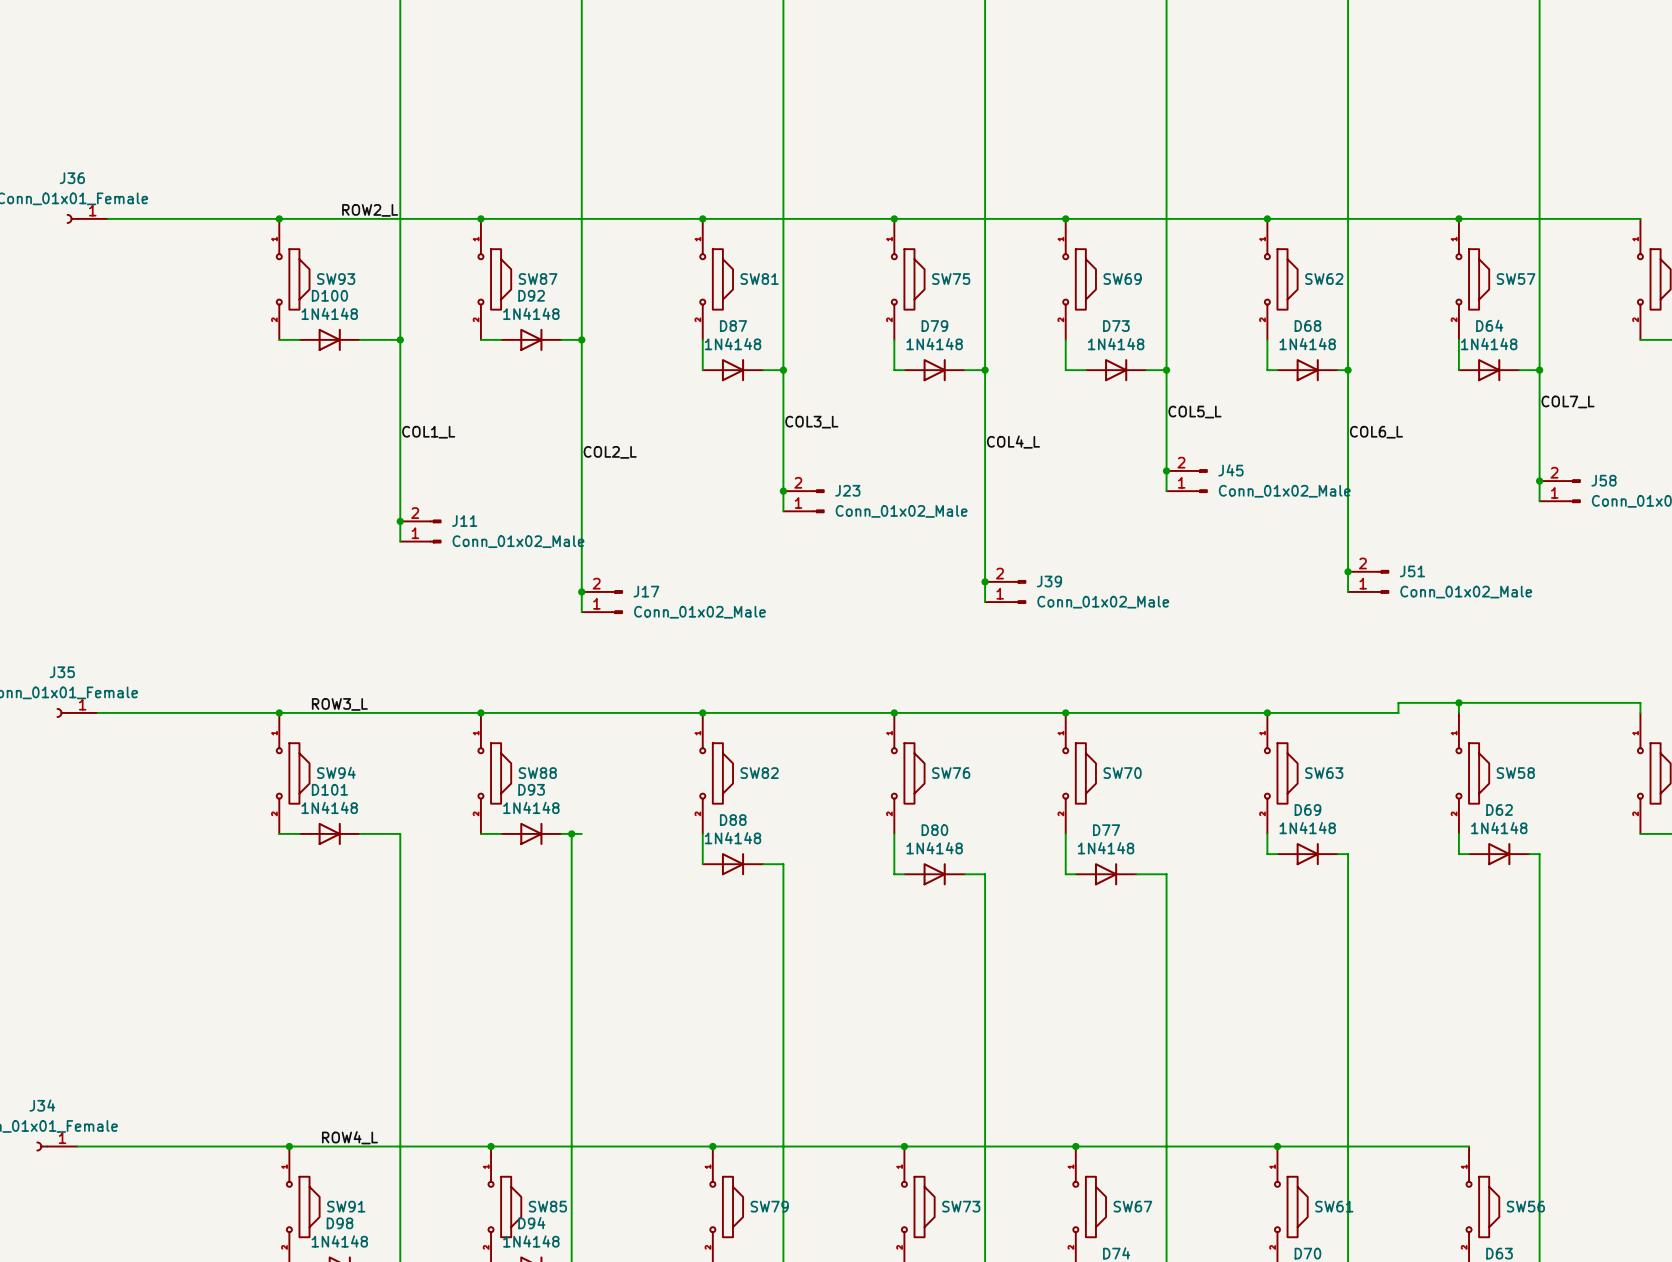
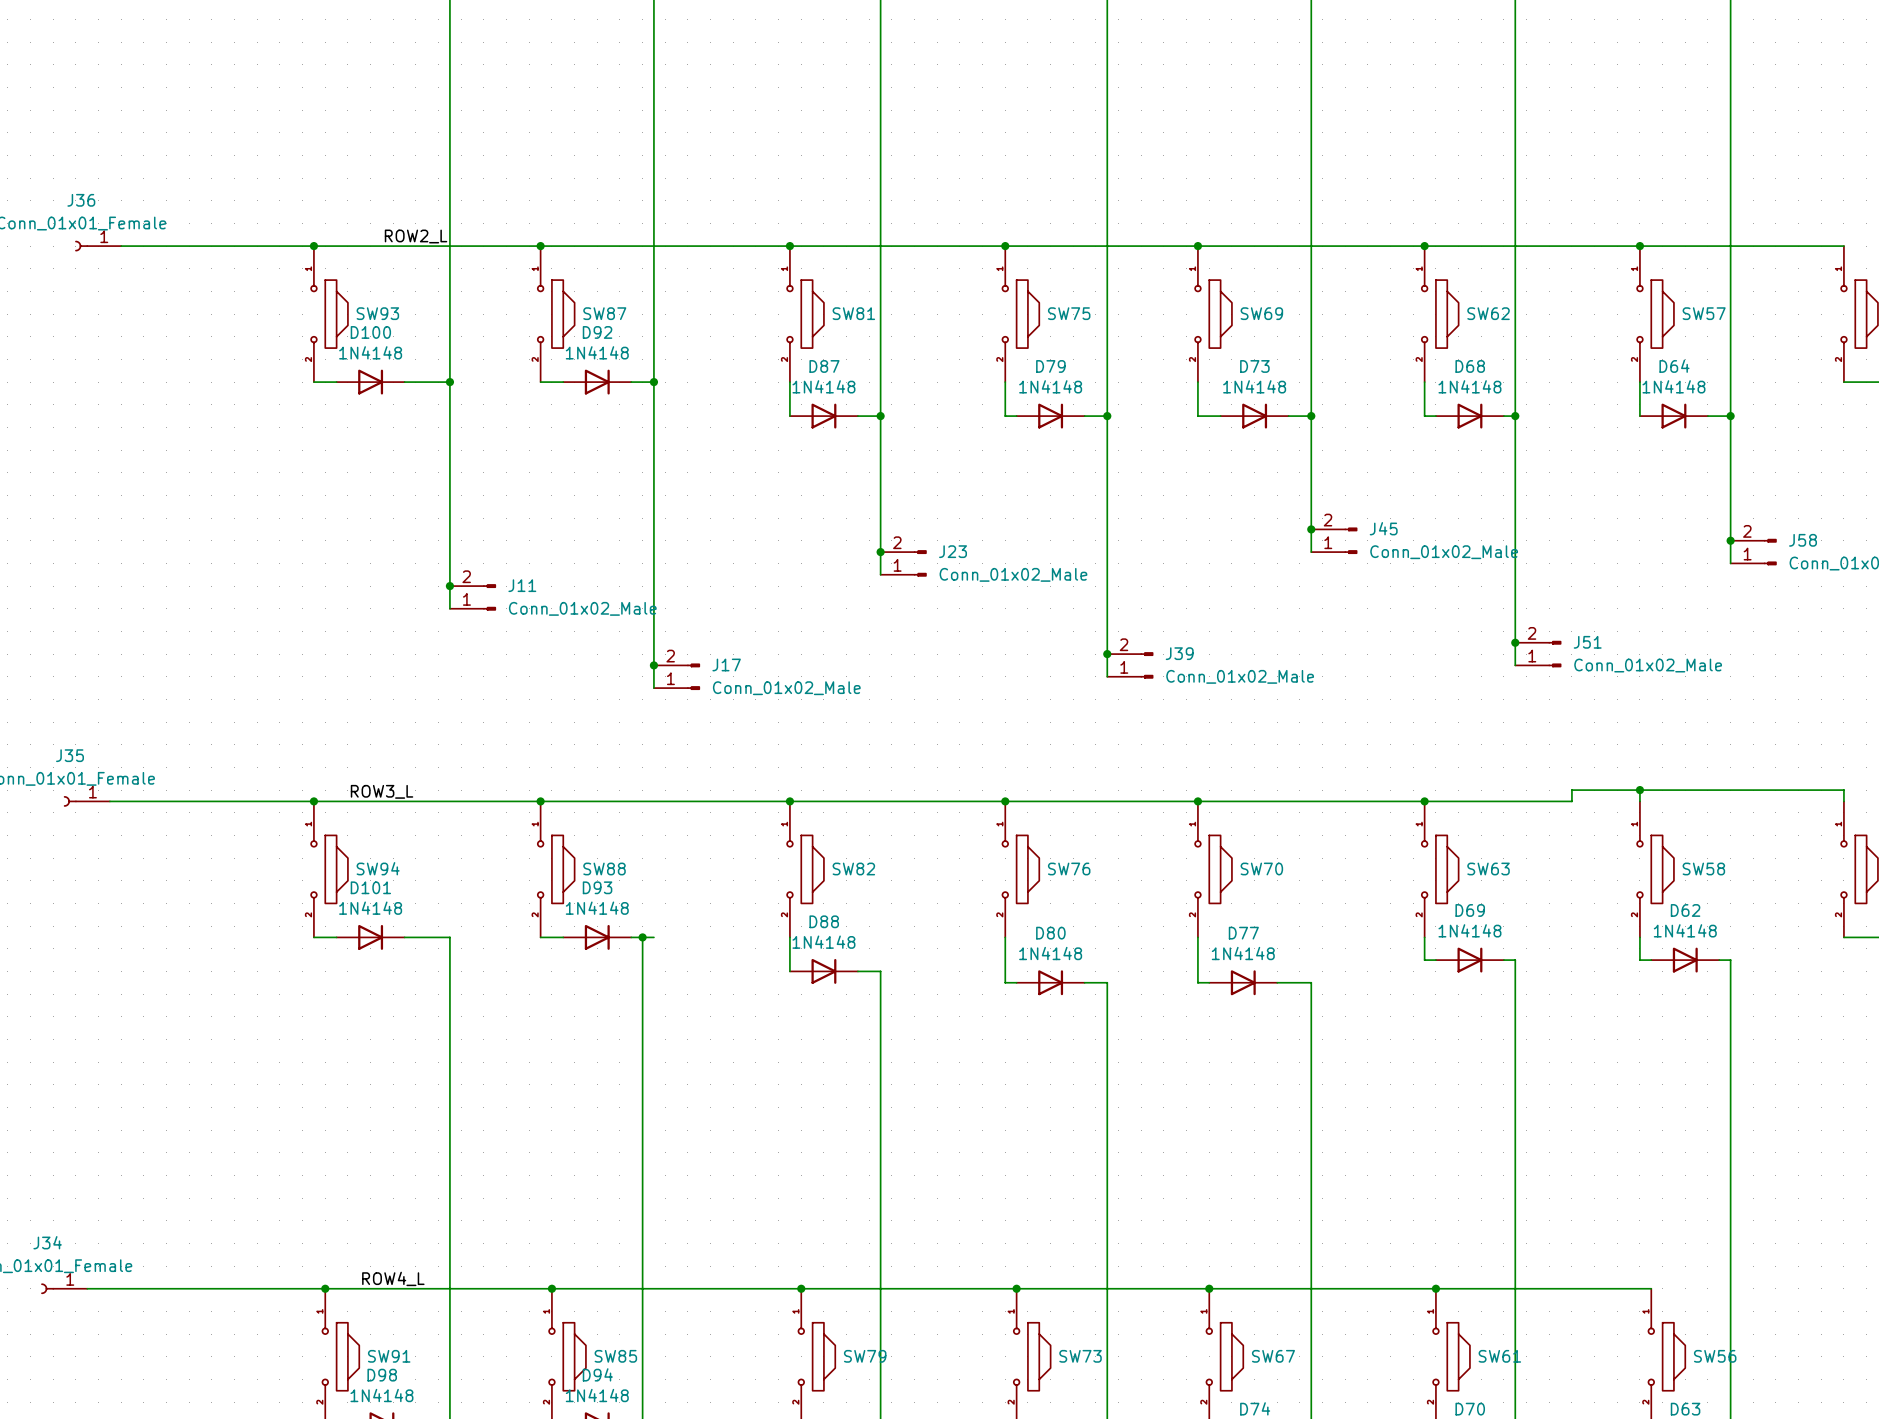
label: COL7_L (1568, 401) -> none
label: COL5_L (1194, 412) -> none
label: COL3_L (811, 422) -> none
label: COL1_L (428, 432) -> none
label: COL6_L (1376, 432) -> none
label: COL4_L (1013, 442) -> none
label: COL2_L (610, 452) -> none

